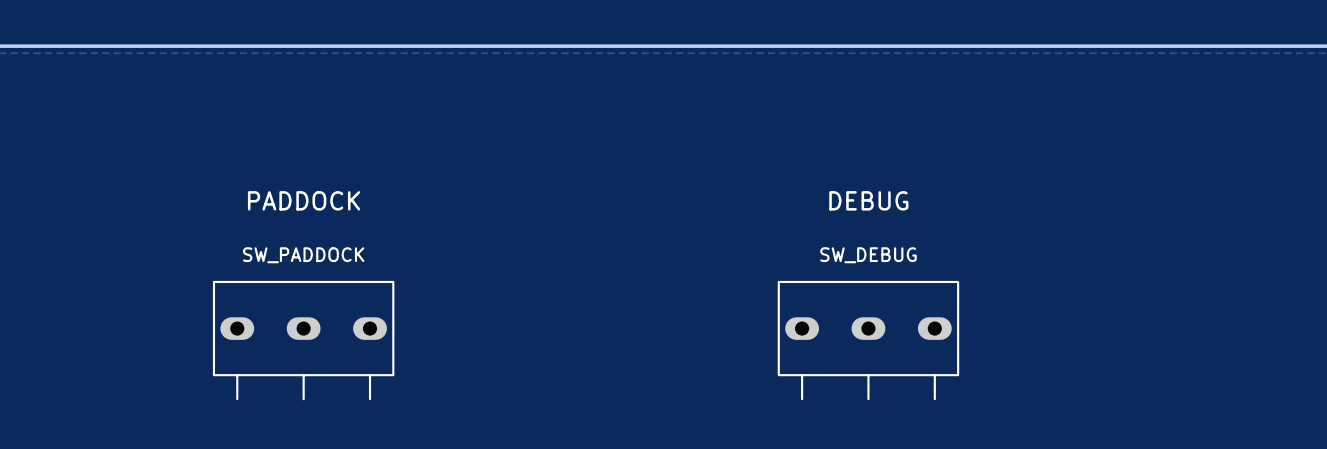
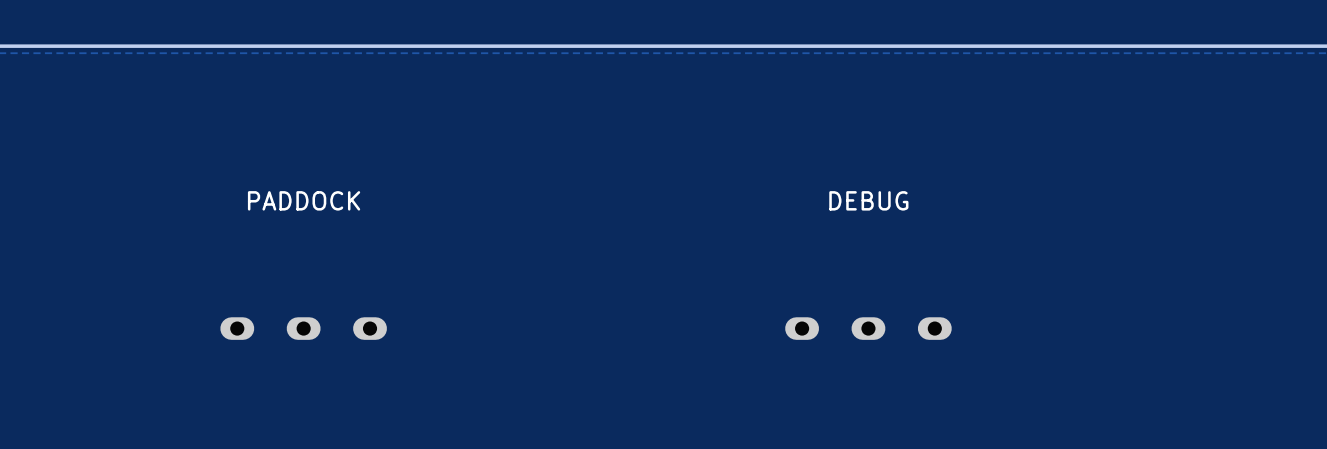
SW_PADDOCK: (303, 340) -> none
SW_DEBUG: (868, 340) -> none

